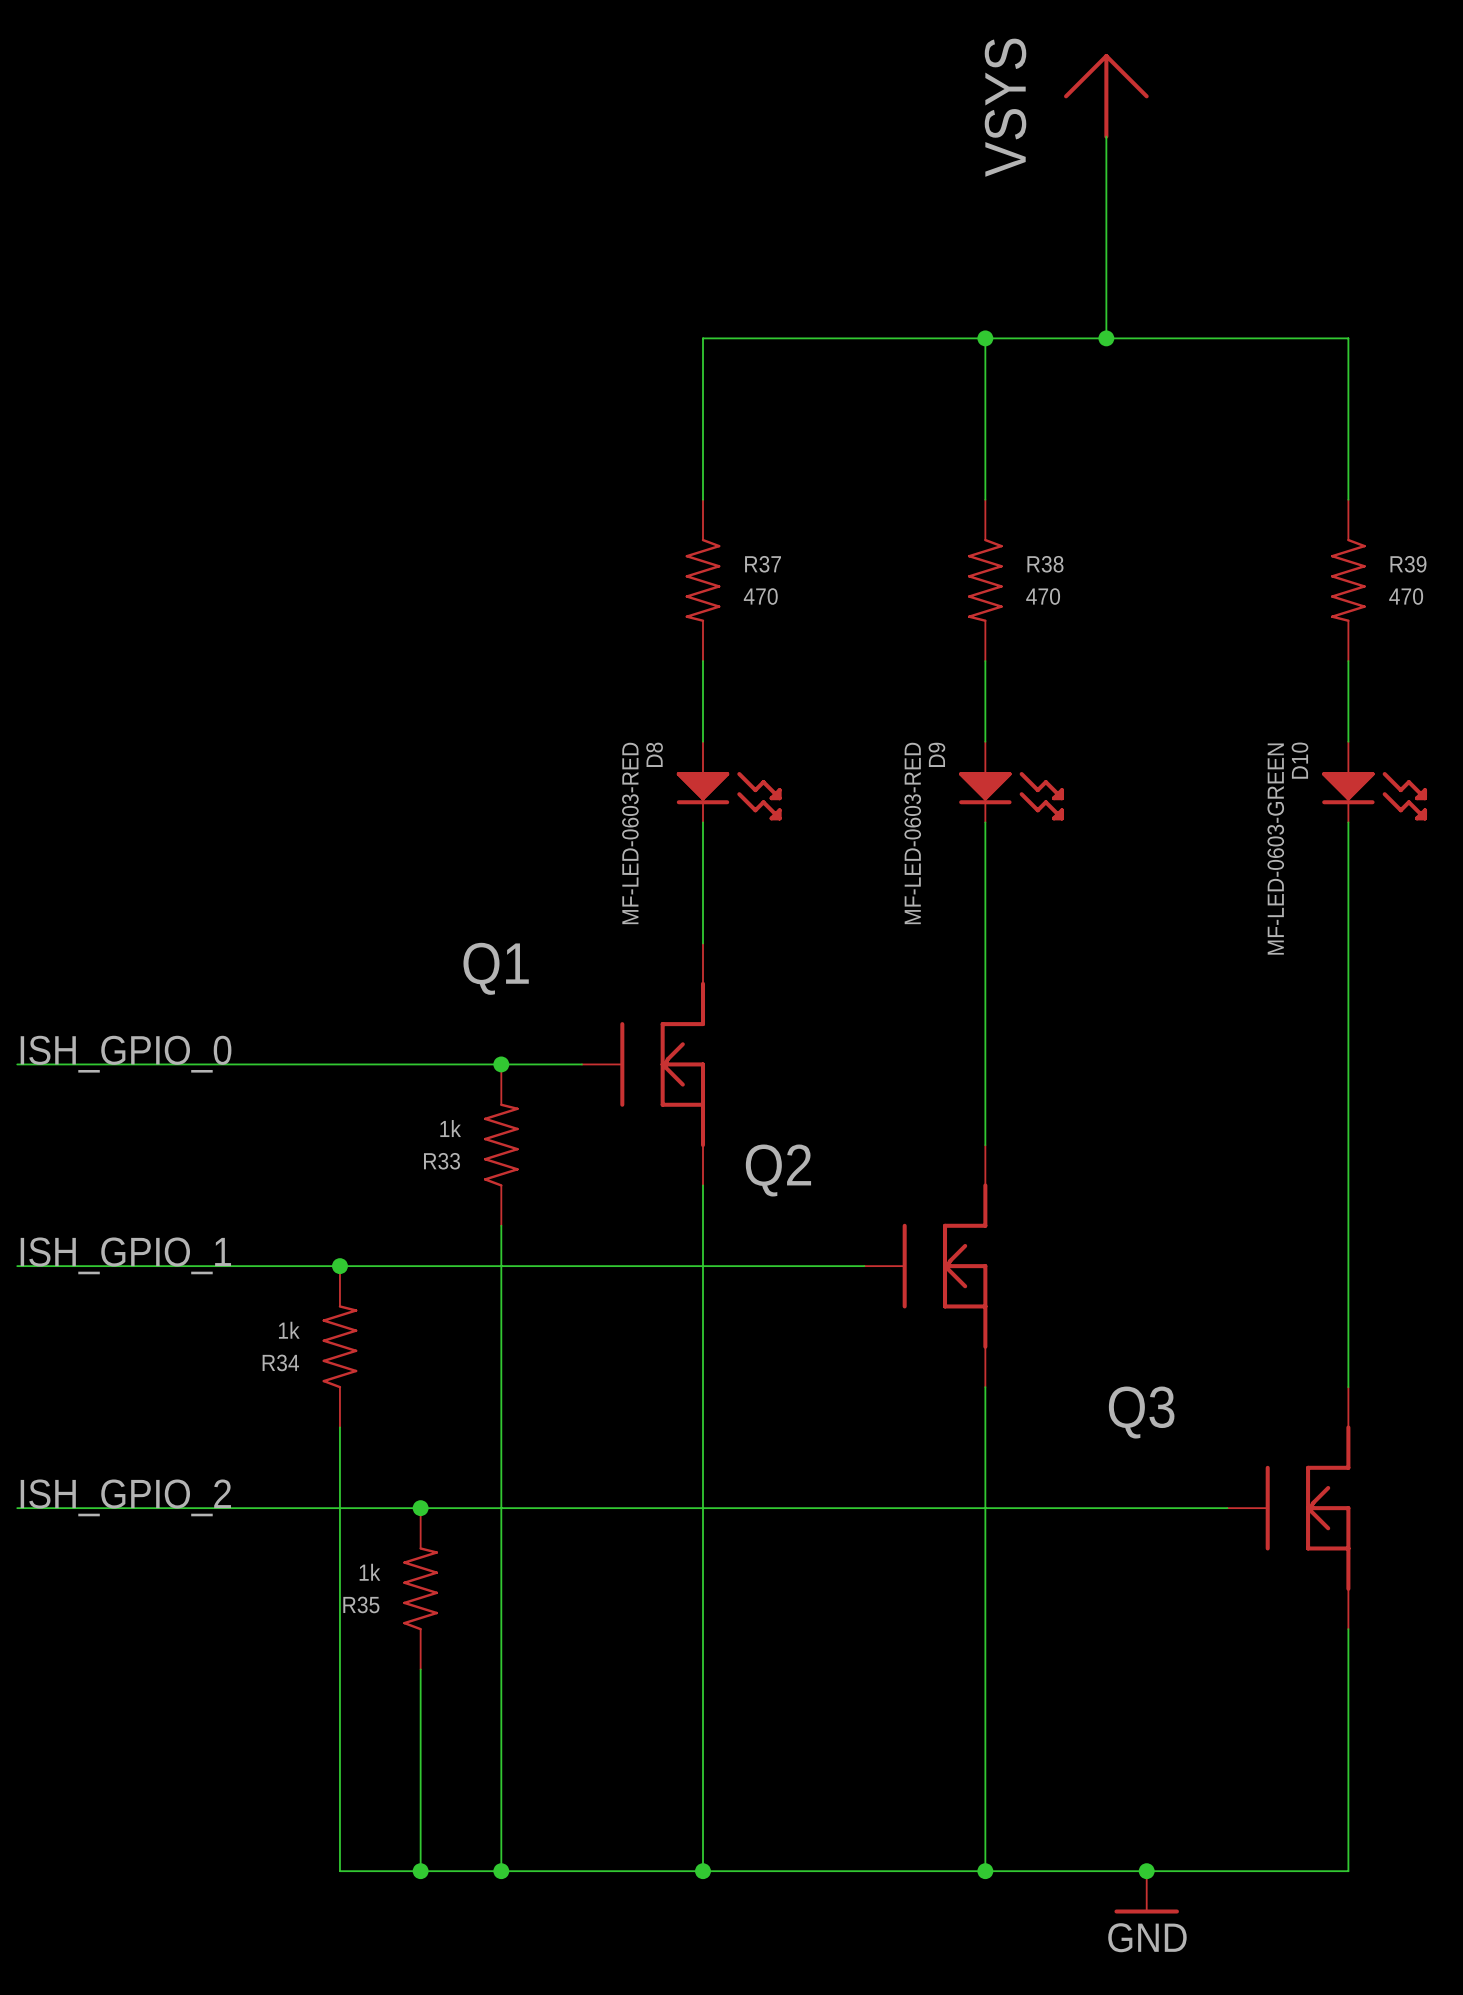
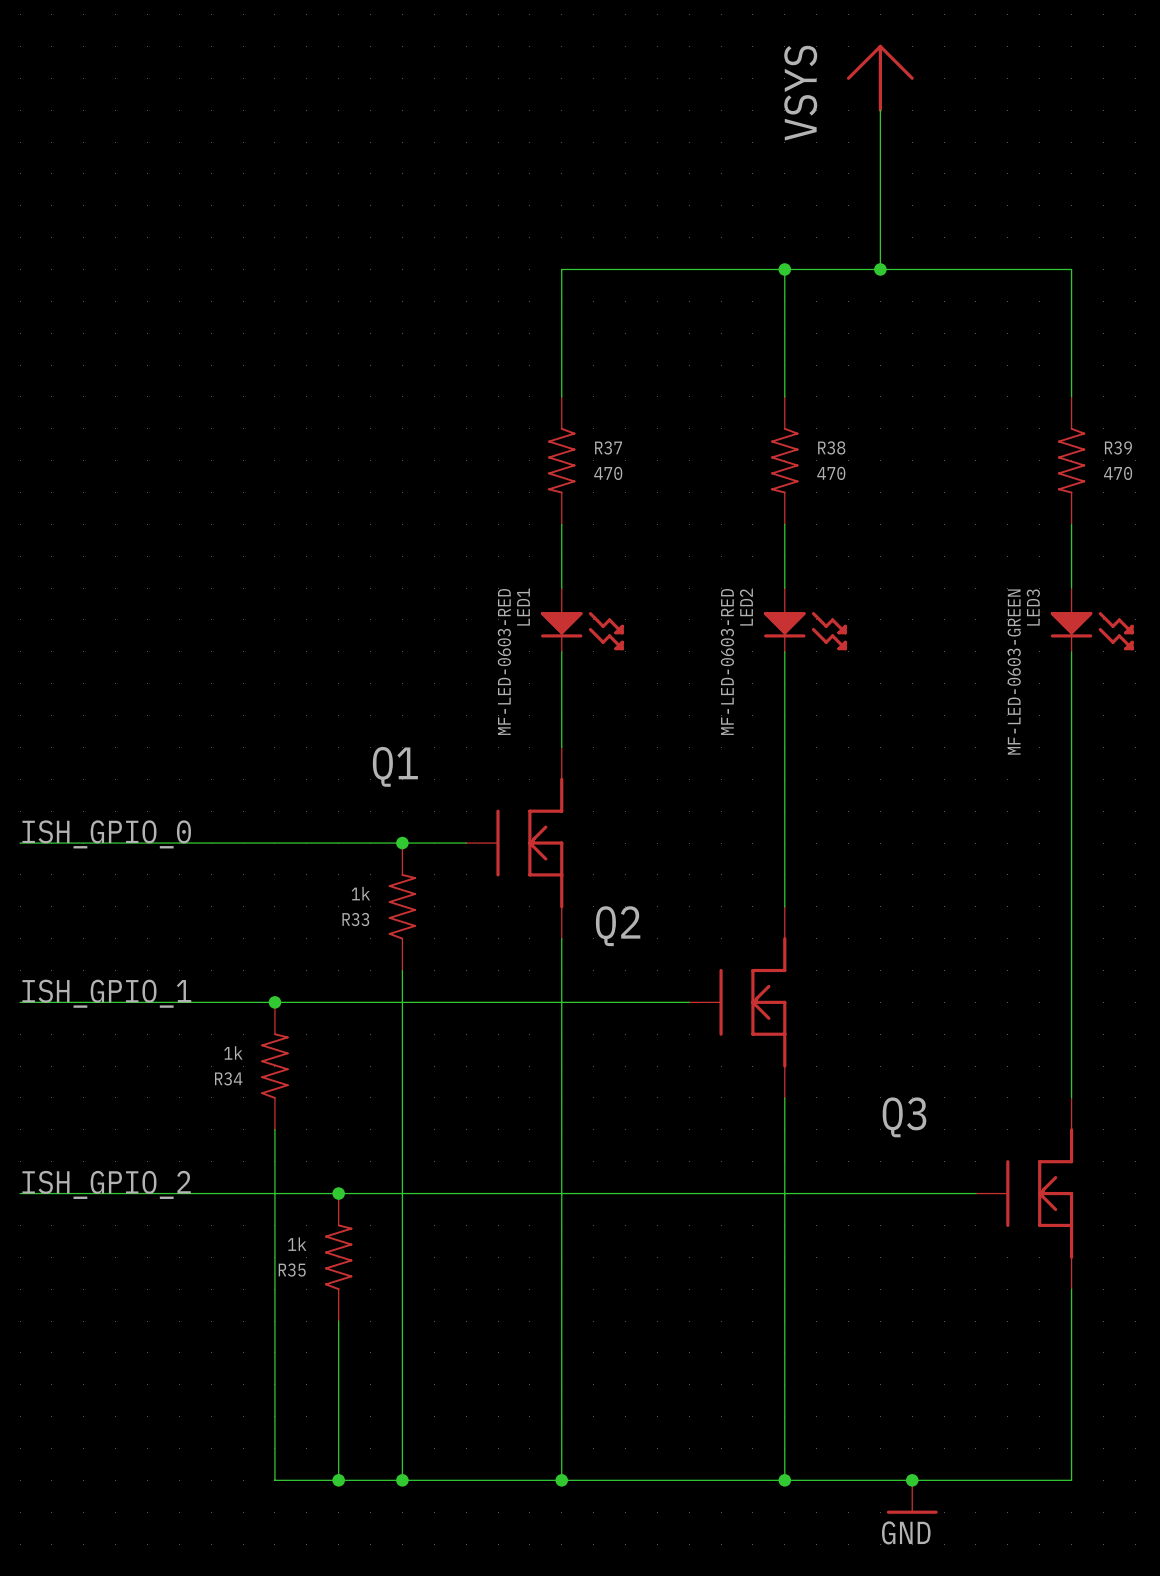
D8 name: D8 (654, 754) -> LED1 (523, 607)
D9 name: D9 (936, 754) -> LED2 (746, 607)
D10 name: D10 (1299, 760) -> LED3 (1033, 607)

